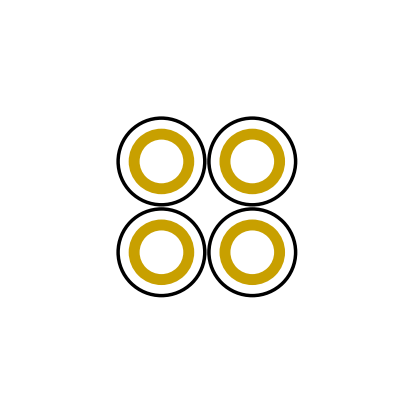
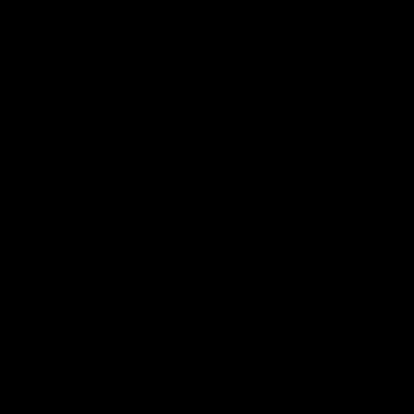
part: (161, 161) -> none
part: (252, 161) -> none
part: (161, 252) -> none
part: (252, 252) -> none

